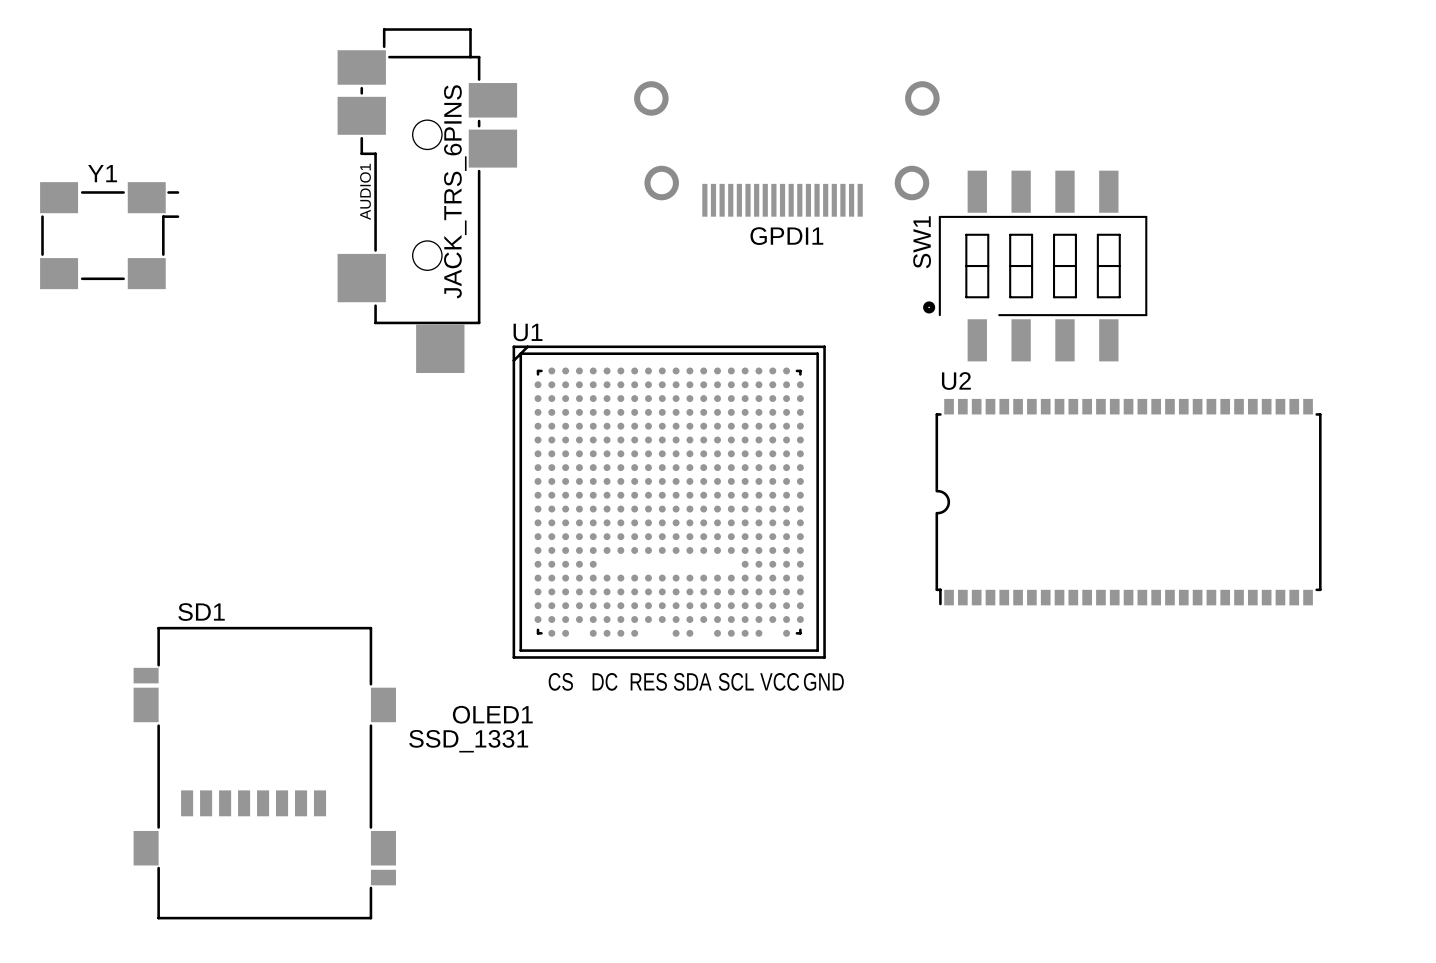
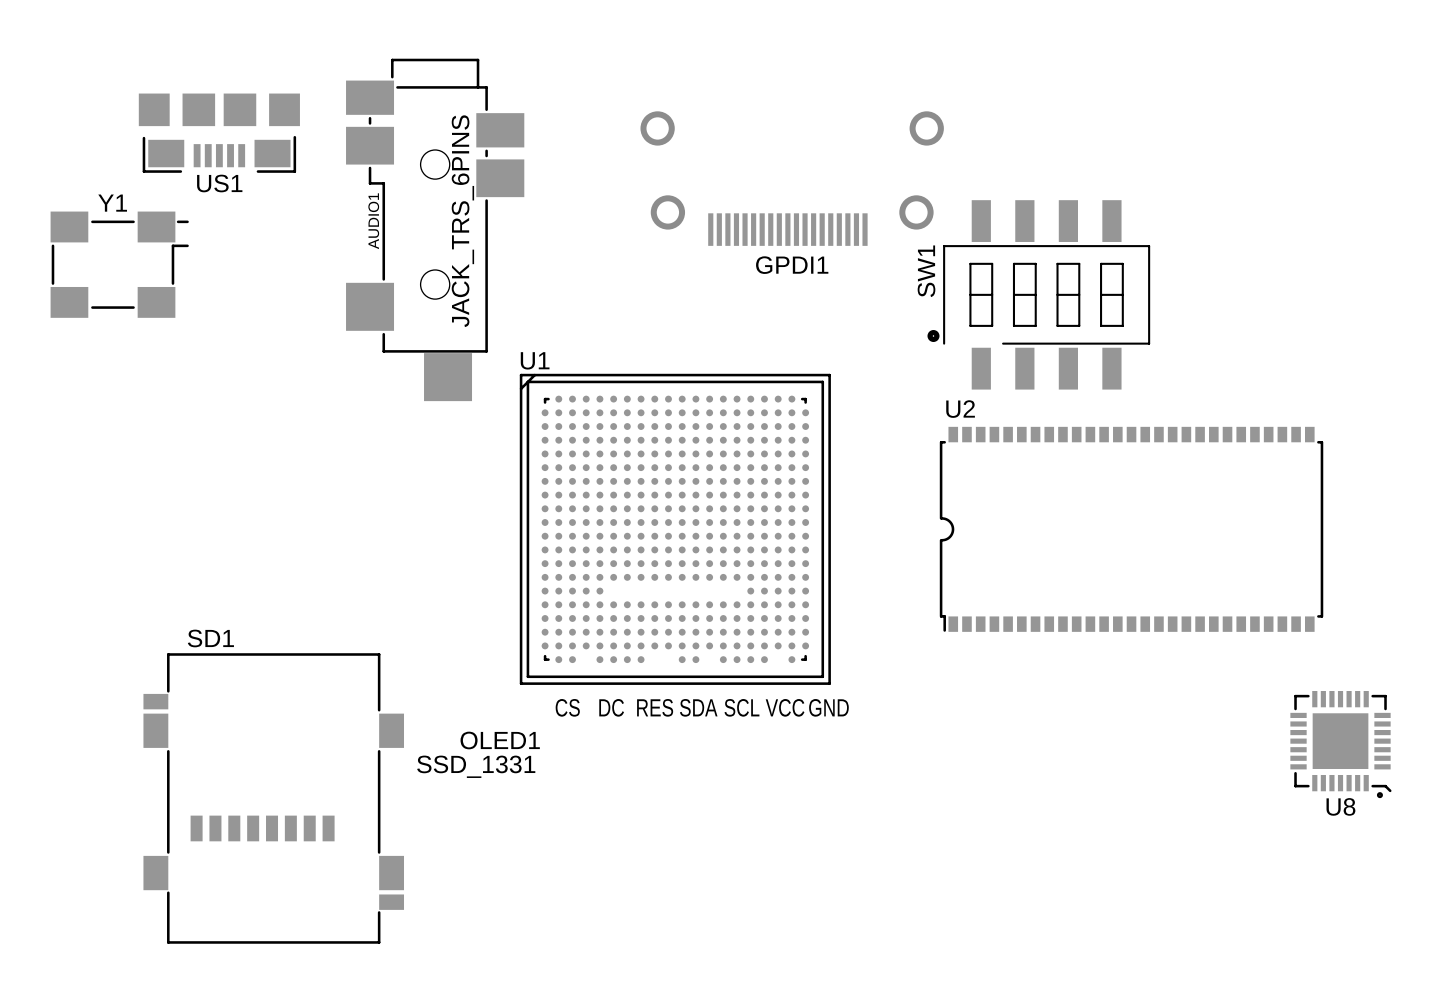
US1: none -> (219, 133)
U8: none -> (1340, 744)

